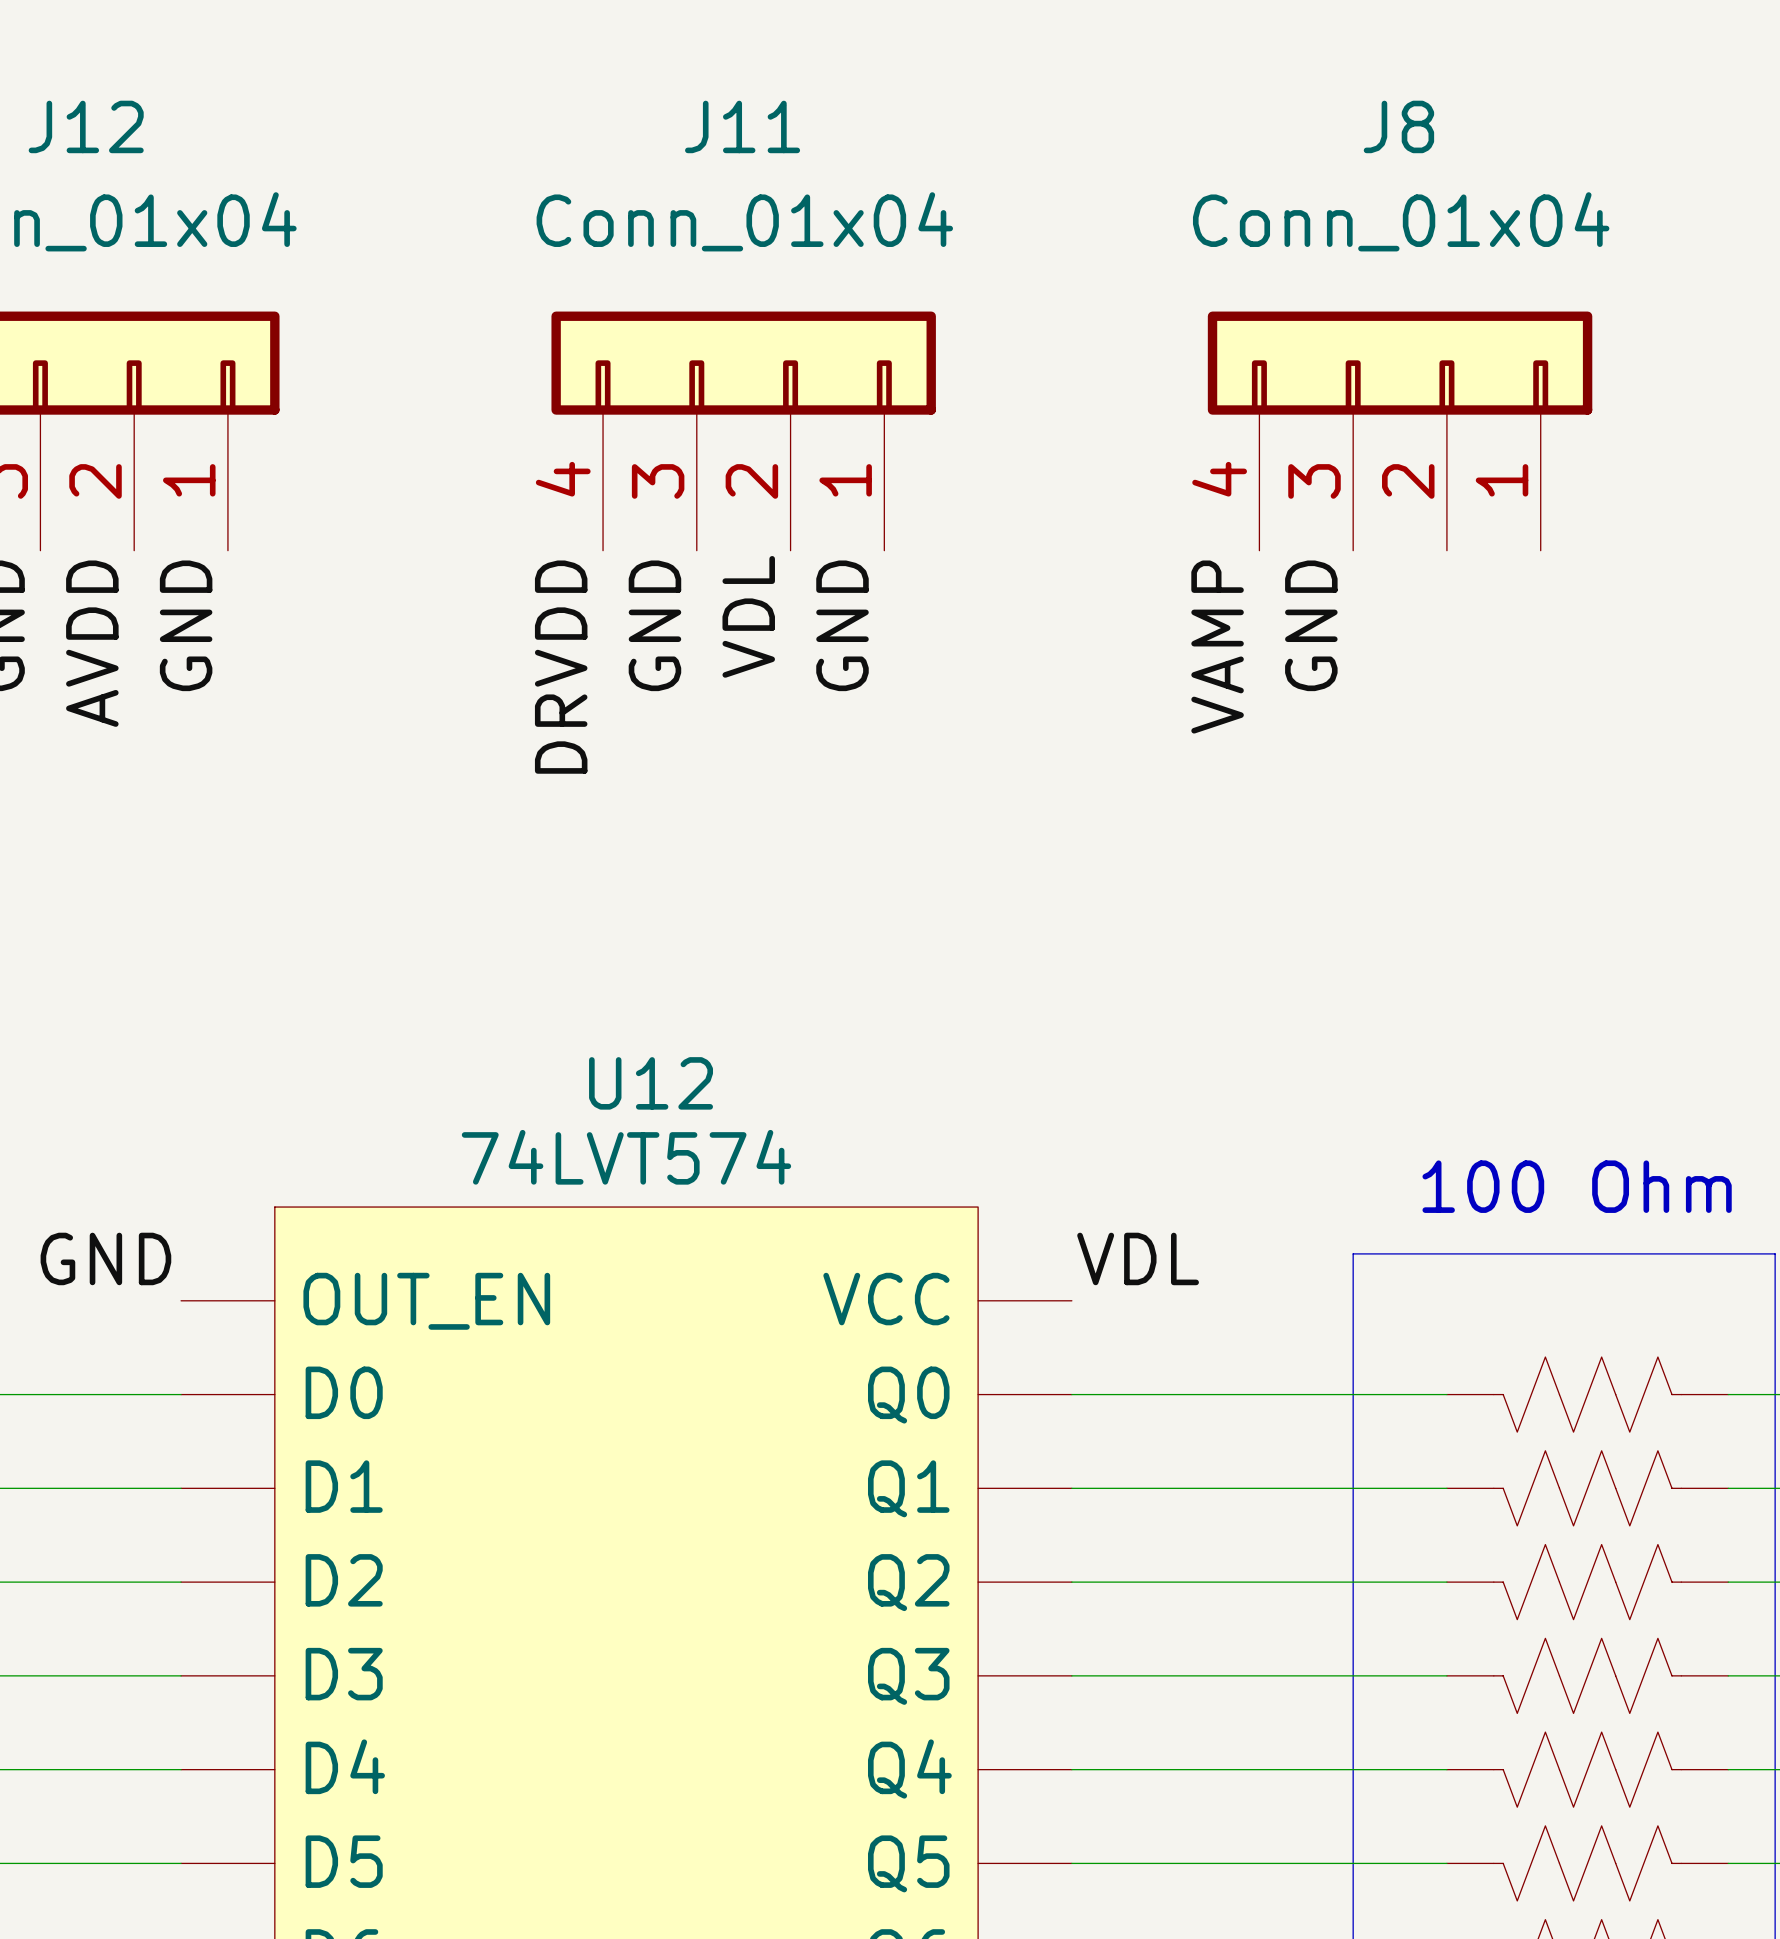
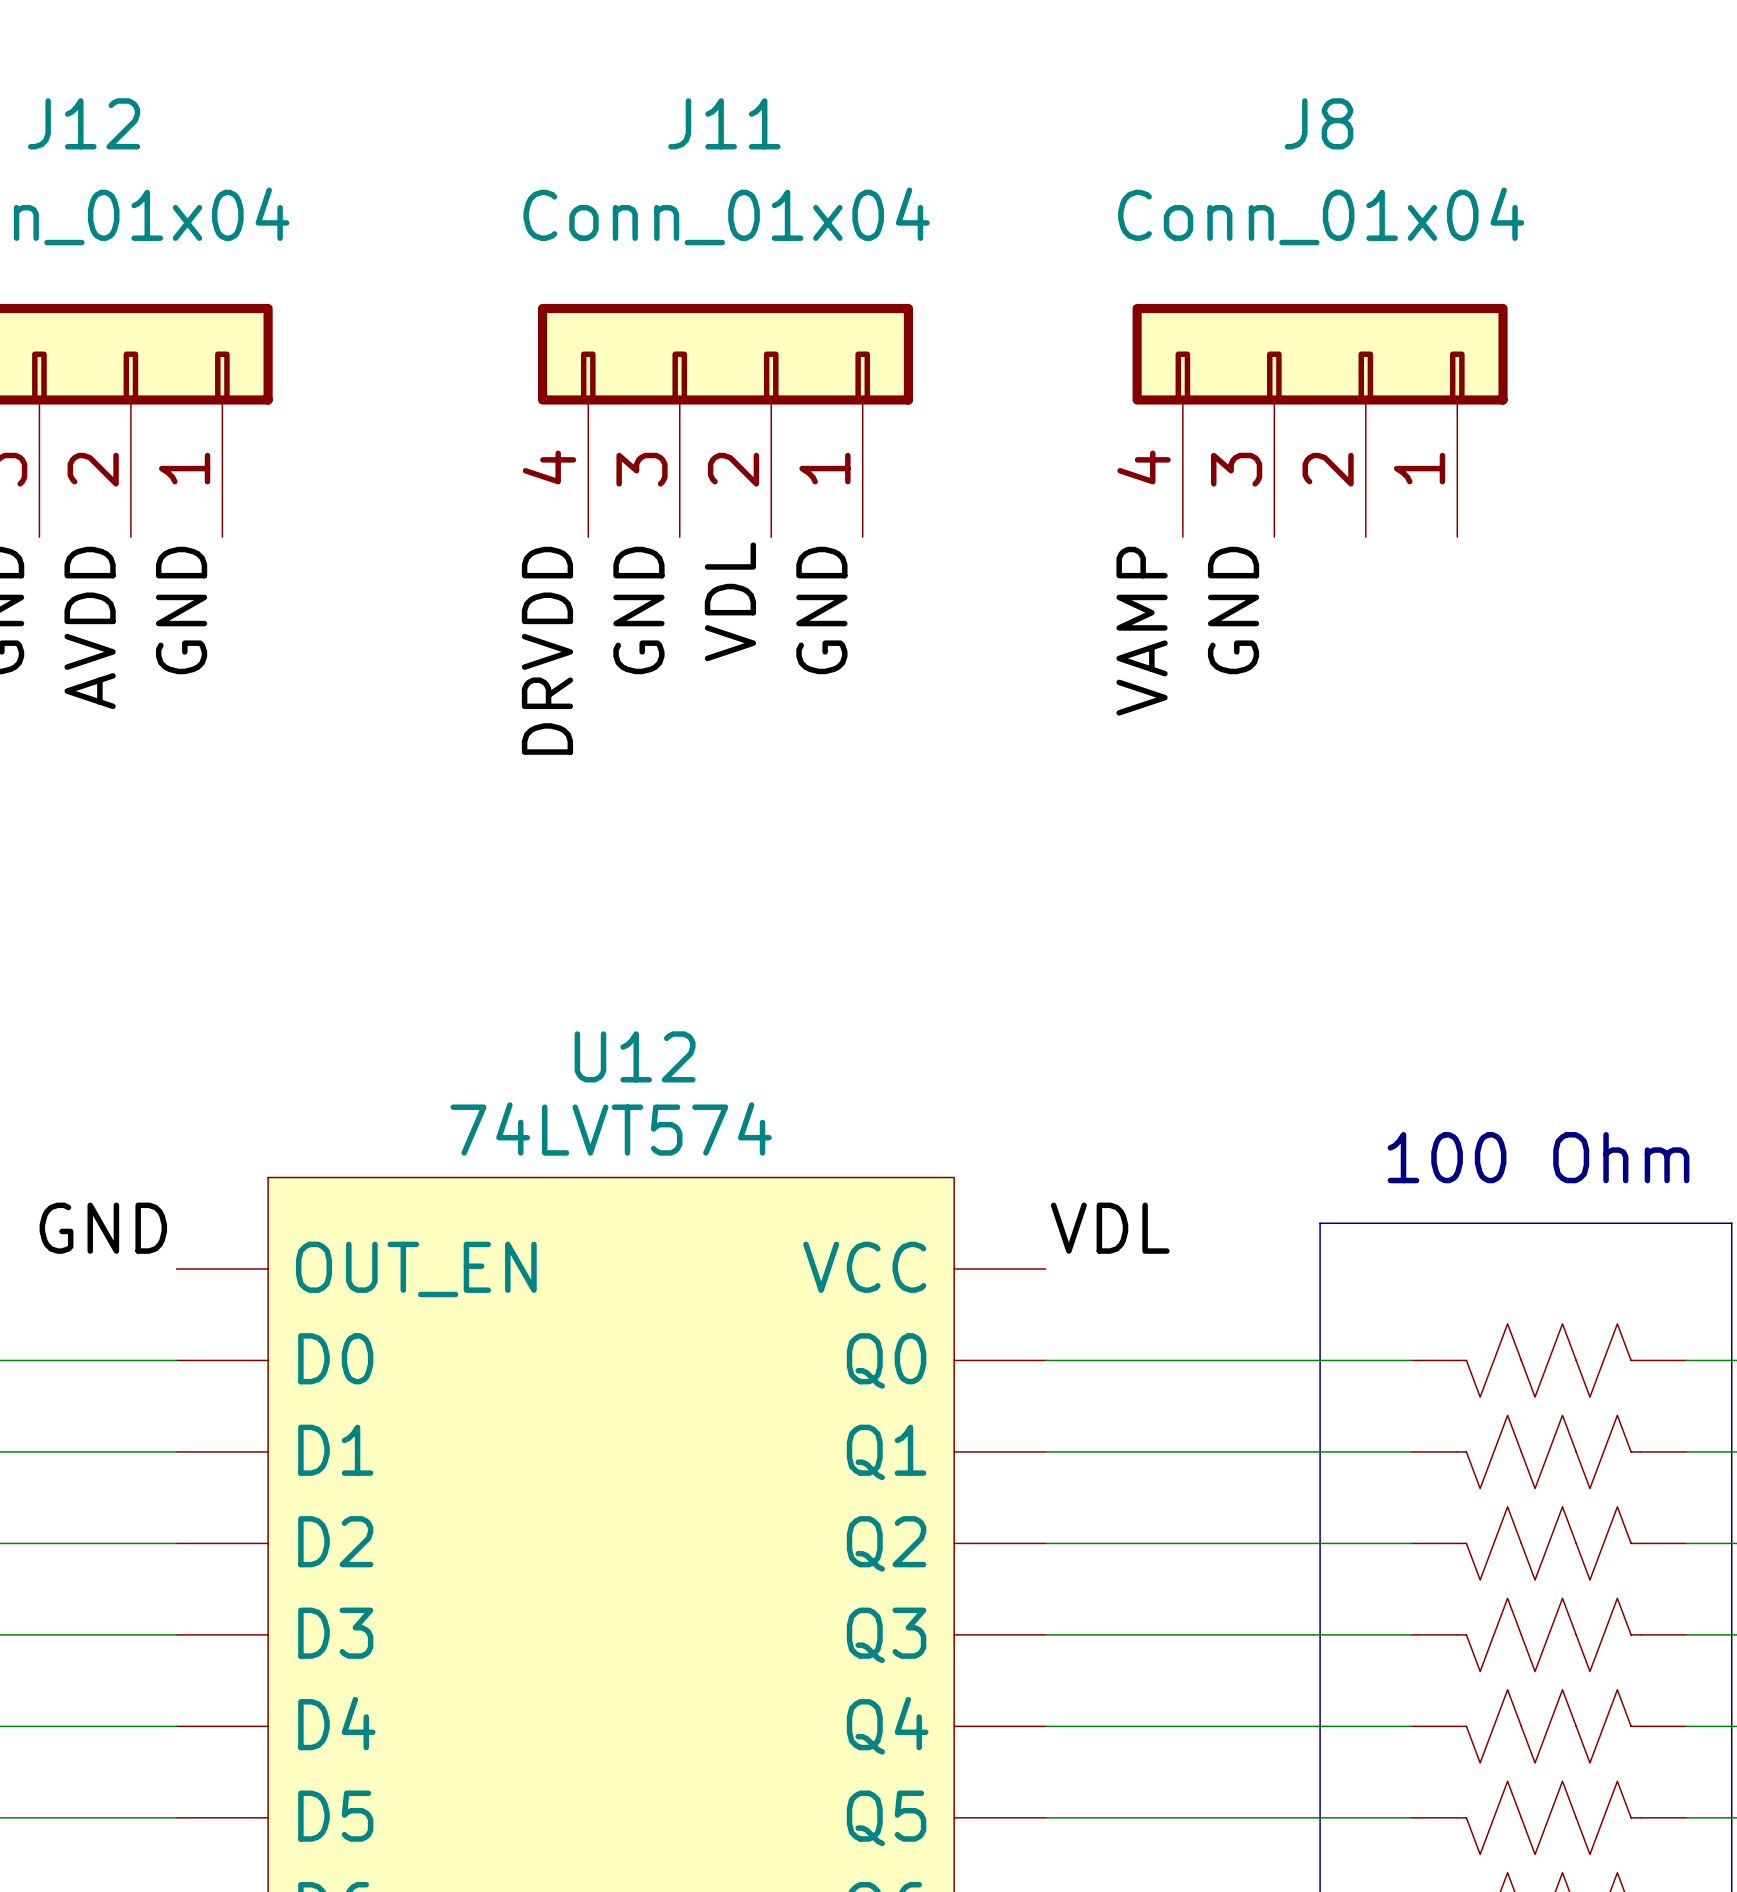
J8 position: (1400, 431) -> (1320, 420)
label position: GND (1311, 625) -> GND (1233, 610)
label position: VAMP (1217, 647) -> VAMP (1142, 631)

